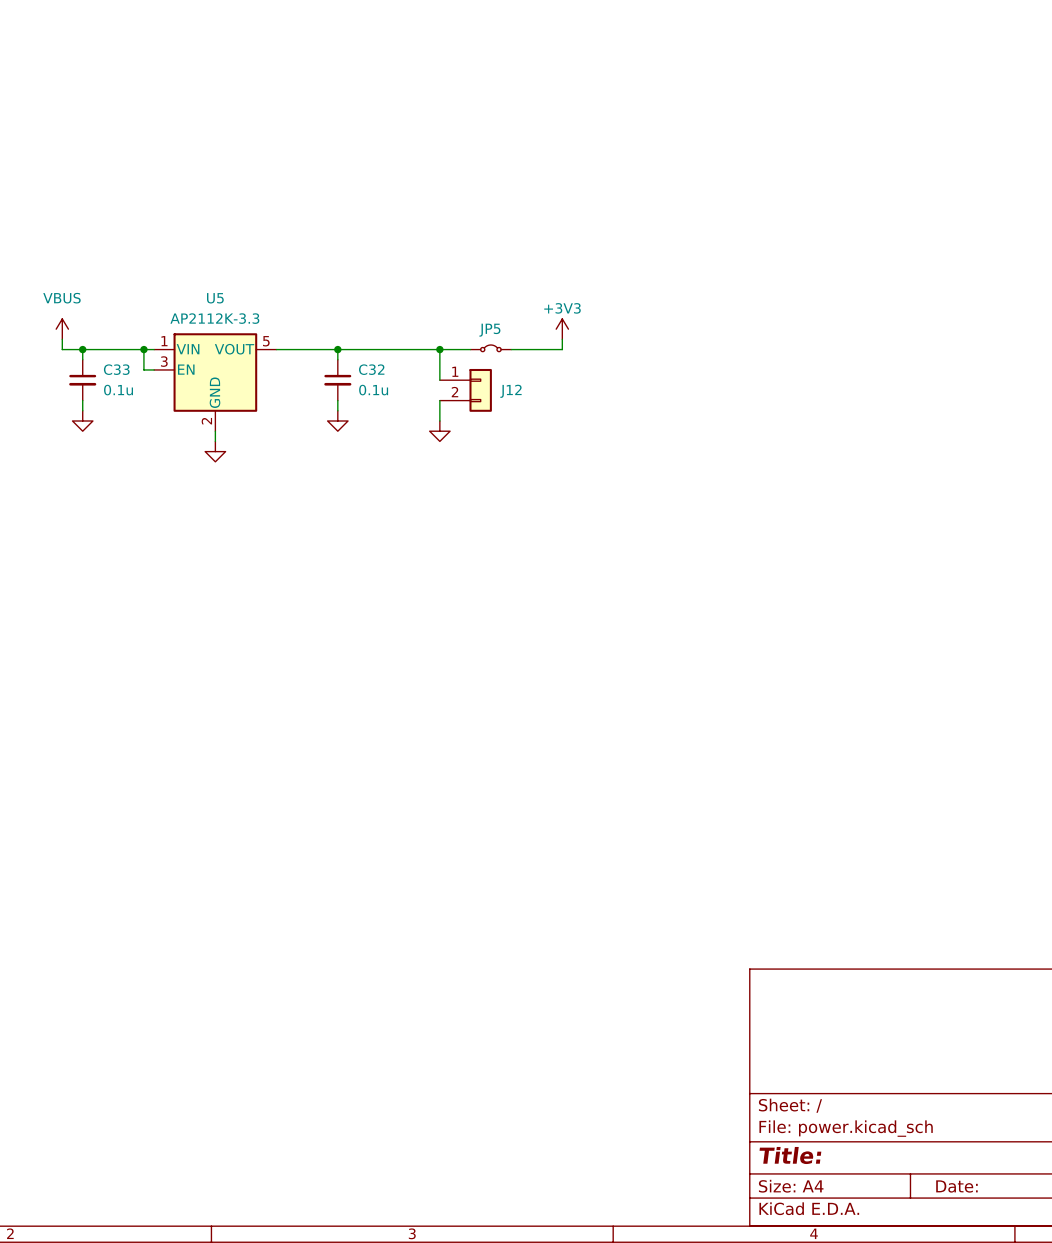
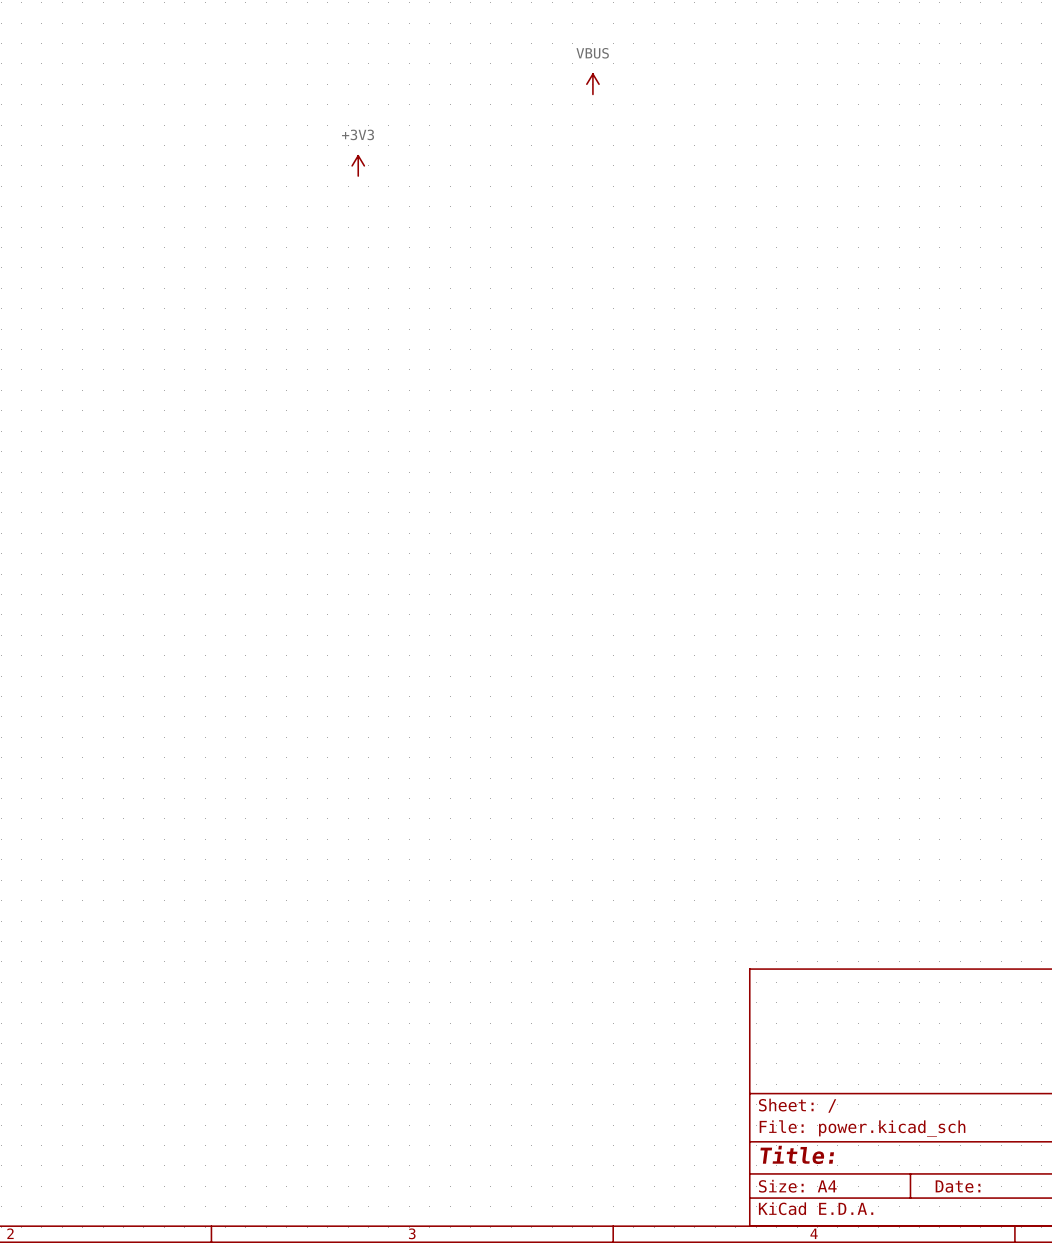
power symbol: none -> VBUS (592, 84)
power symbol: none -> +3V3 (358, 165)
power symbol: VBUS (62, 329) -> none
power symbol: +3V3 (562, 329) -> none
wire: (62, 339) (62, 349) (154, 349) -> none
wire: (562, 339) (562, 349) (511, 349) -> none
JP5: (490, 348) -> none
wire: (82, 349) (82, 359) -> none
junction: (82, 349) -> none
wire: (143, 349) (143, 369) (154, 369) -> none
junction: (143, 349) -> none
wire: (276, 349) (470, 349) -> none
wire: (337, 349) (337, 359) -> none
junction: (337, 349) -> none
wire: (439, 349) (439, 380) -> none
junction: (439, 349) -> none
C33: 0.1u (82, 380) -> none
C32: 0.1u (337, 380) -> none
U5: AP2112K-3.3 (215, 382) -> none
J12: (465, 390) -> none
wire: (82, 400) (82, 410) -> none
wire: (337, 400) (337, 410) -> none
wire: (439, 400) (439, 421) -> none
power symbol: (82, 421) -> none
power symbol: (337, 421) -> none
wire: (215, 431) (215, 441) -> none
power symbol: (439, 431) -> none
power symbol: (215, 451) -> none

